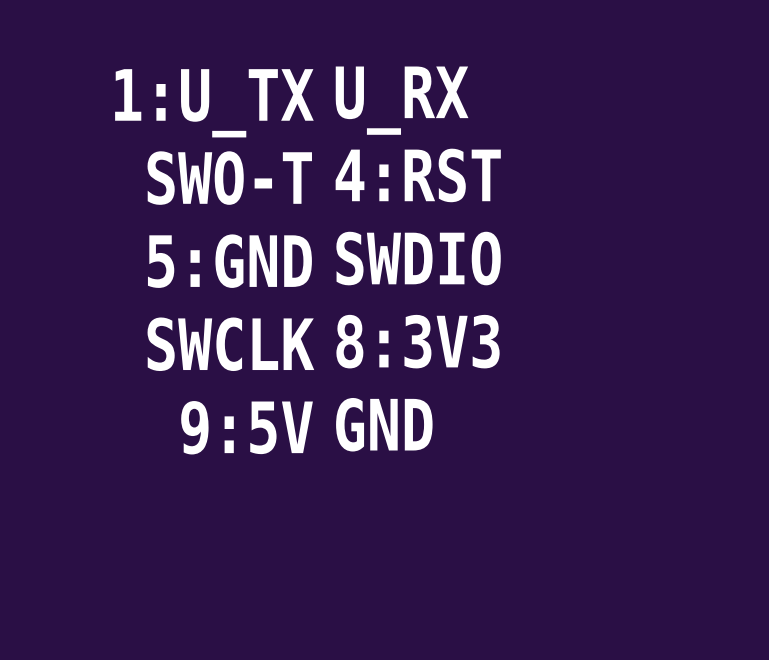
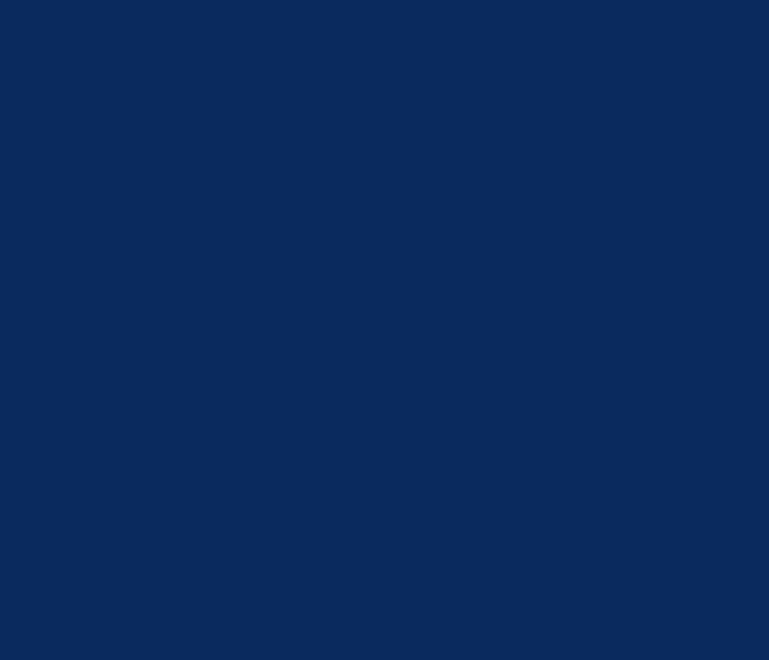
text: U_RX (402, 100) -> none
text: 1:U_TX (214, 103) -> none
text: 4:RST (418, 175) -> none
text: SWO-T (229, 178) -> none
text: SWDIO (418, 258) -> none
text: 5:GND (229, 261) -> none
text: 8:3V3 (418, 341) -> none
text: SWCLK (230, 344) -> none
text: GND (384, 424) -> none
text: 9:5V (247, 427) -> none

